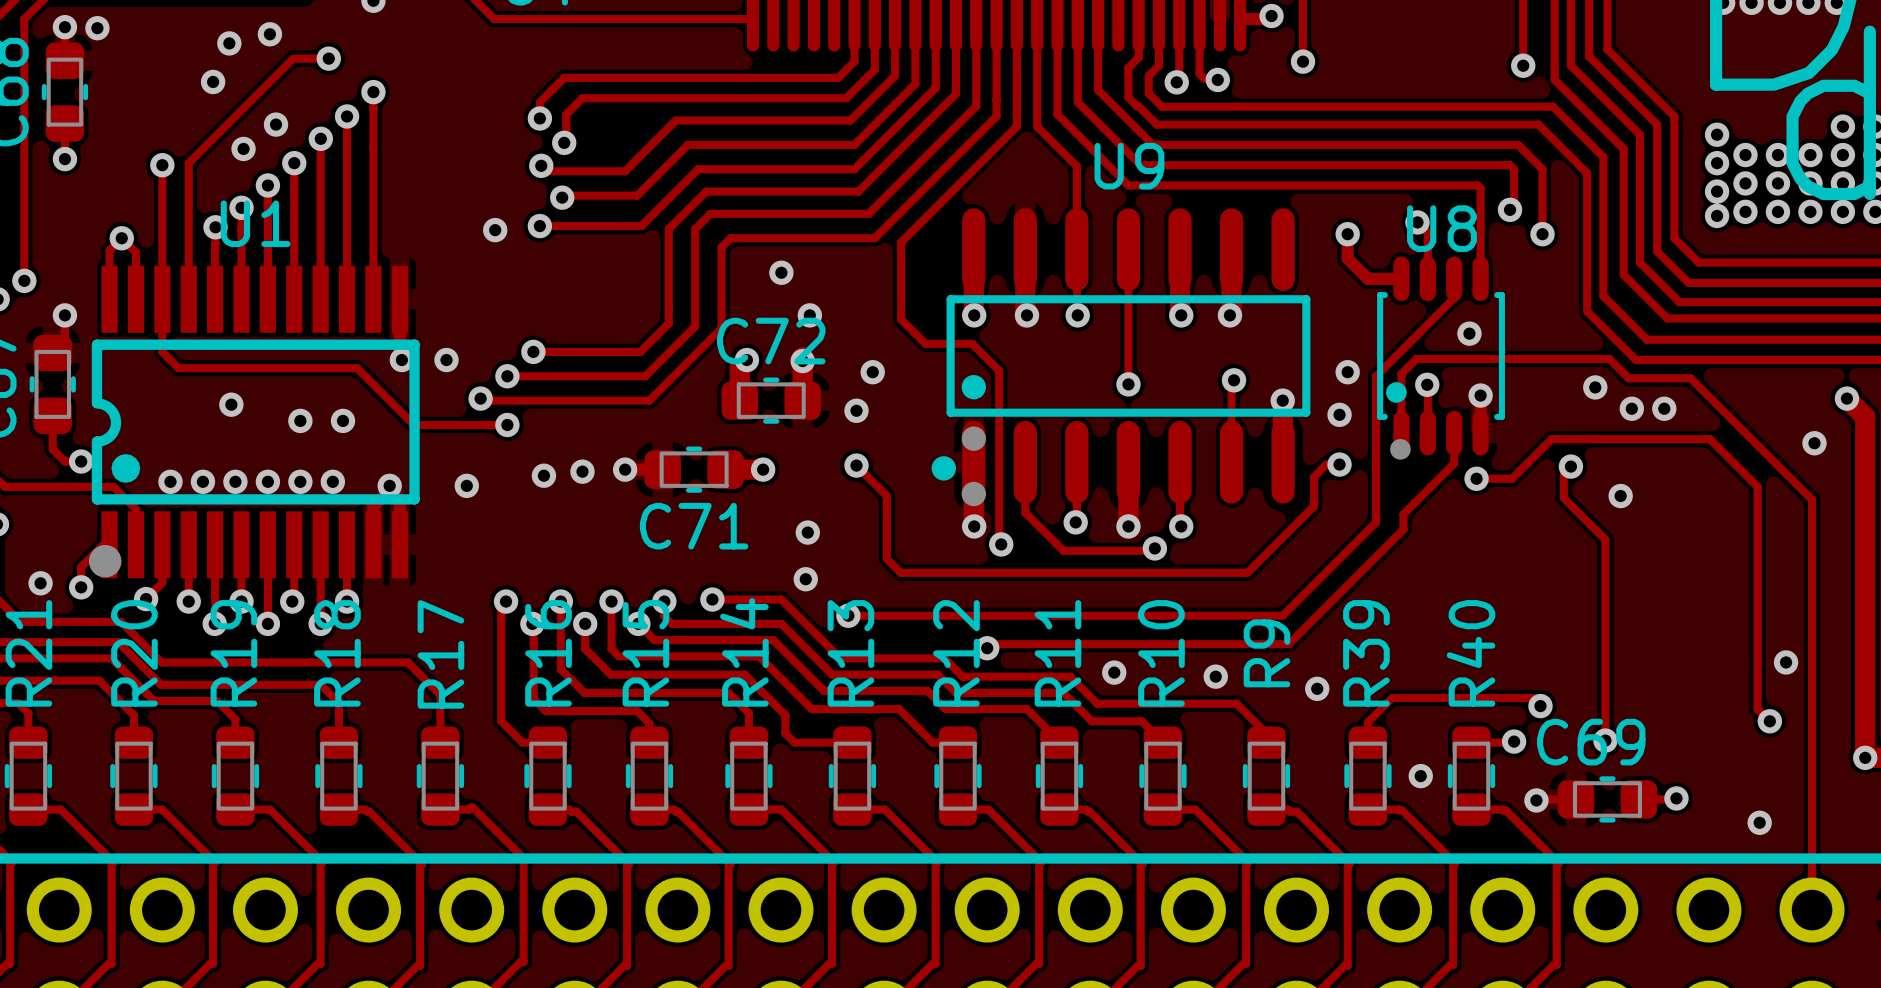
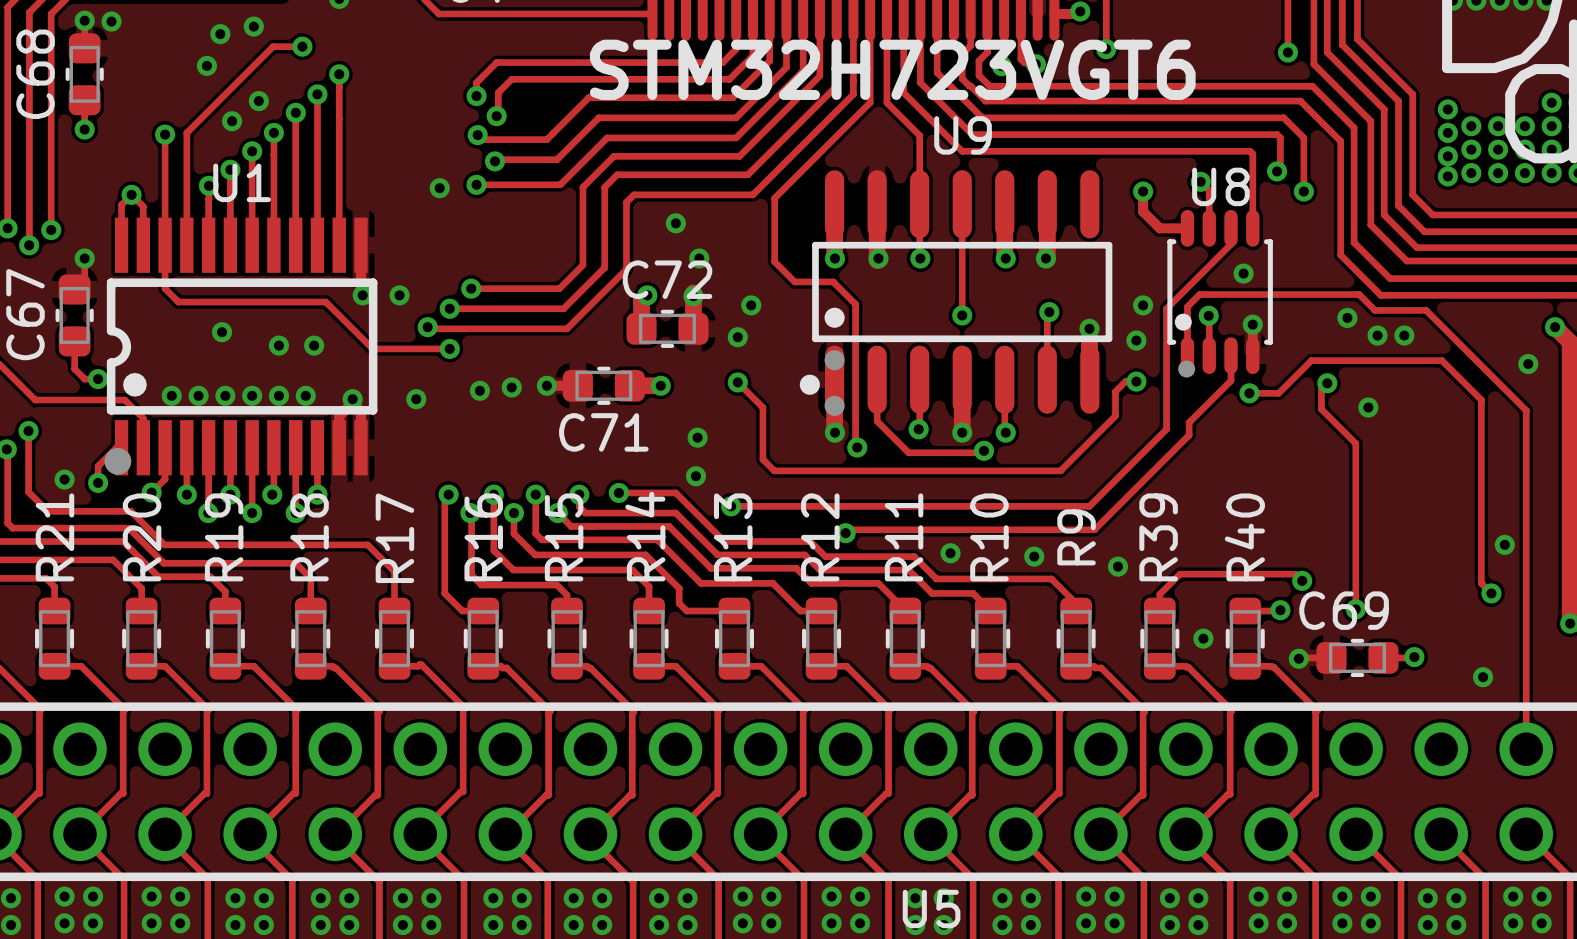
text: none -> STM32H723VGT6 (892, 69)

